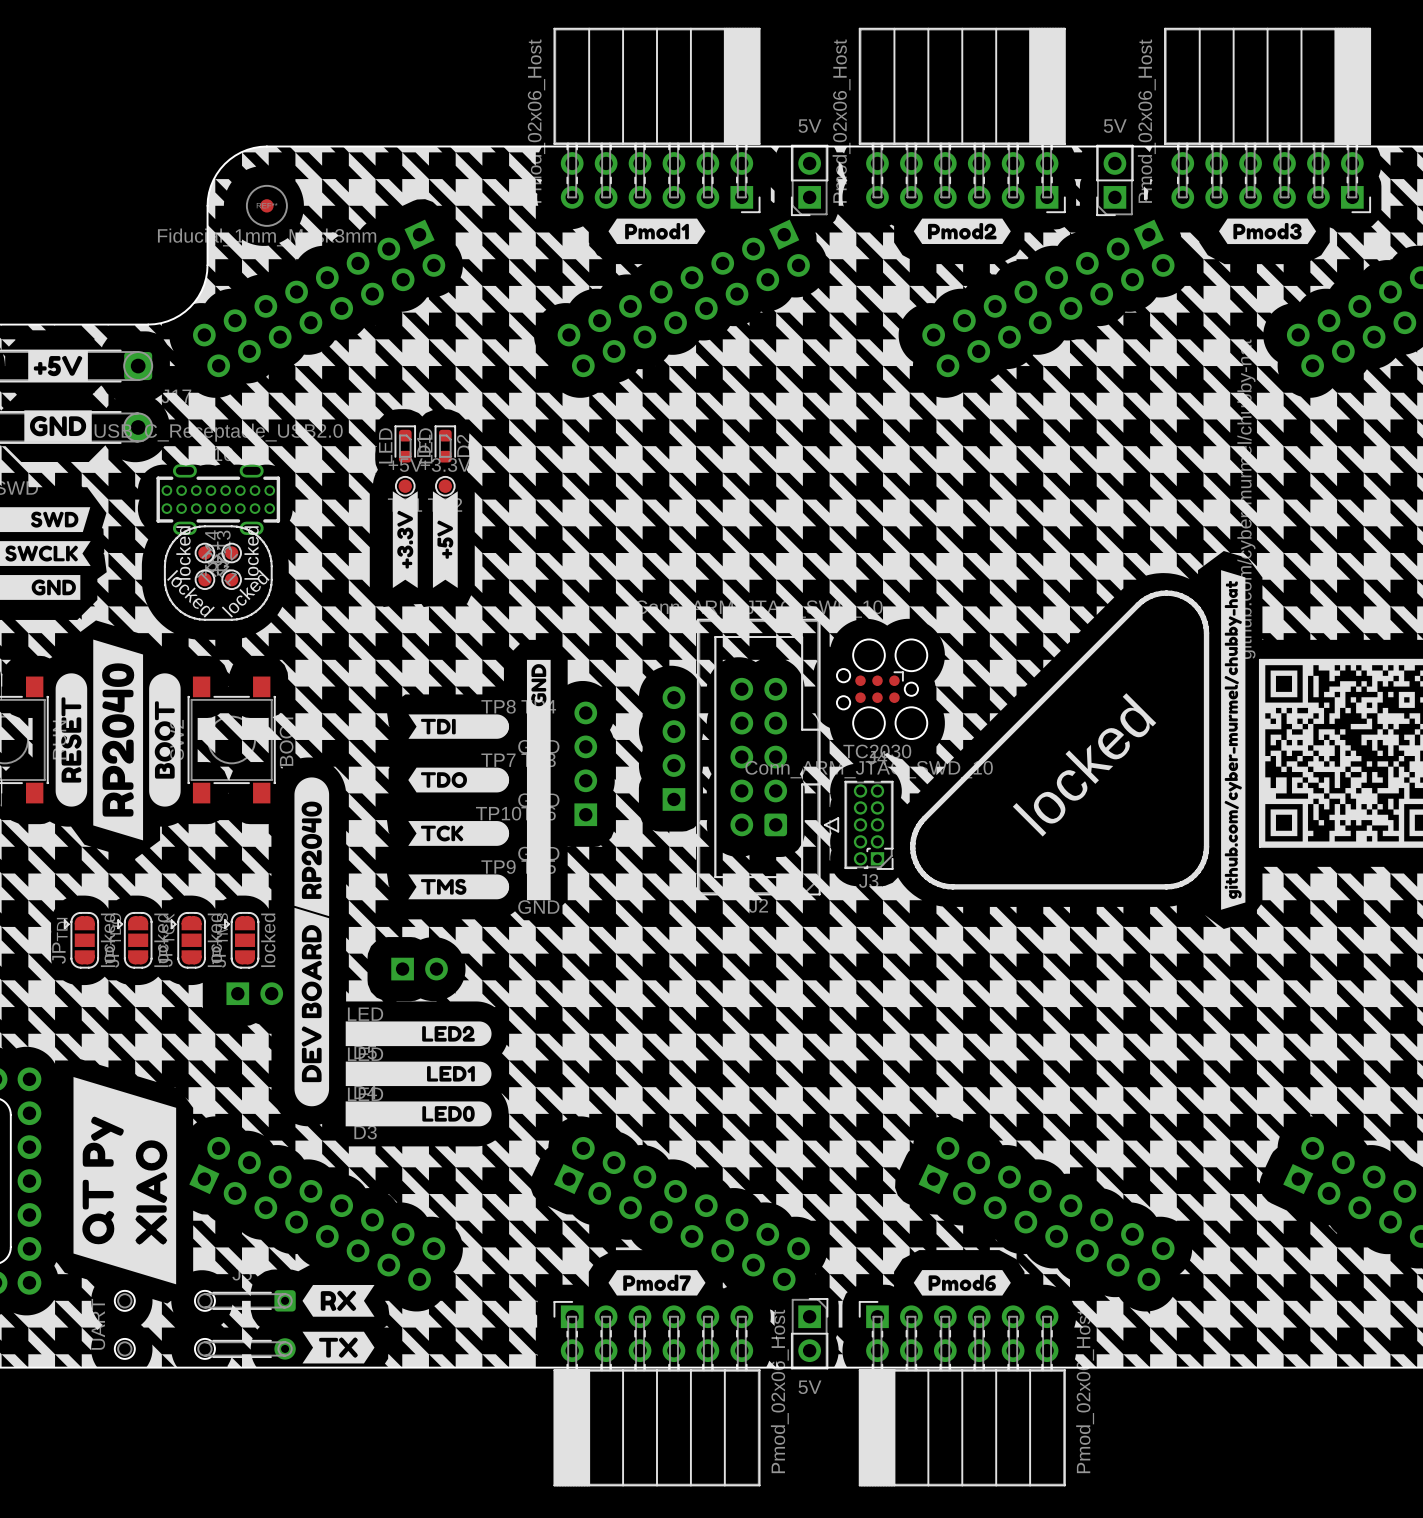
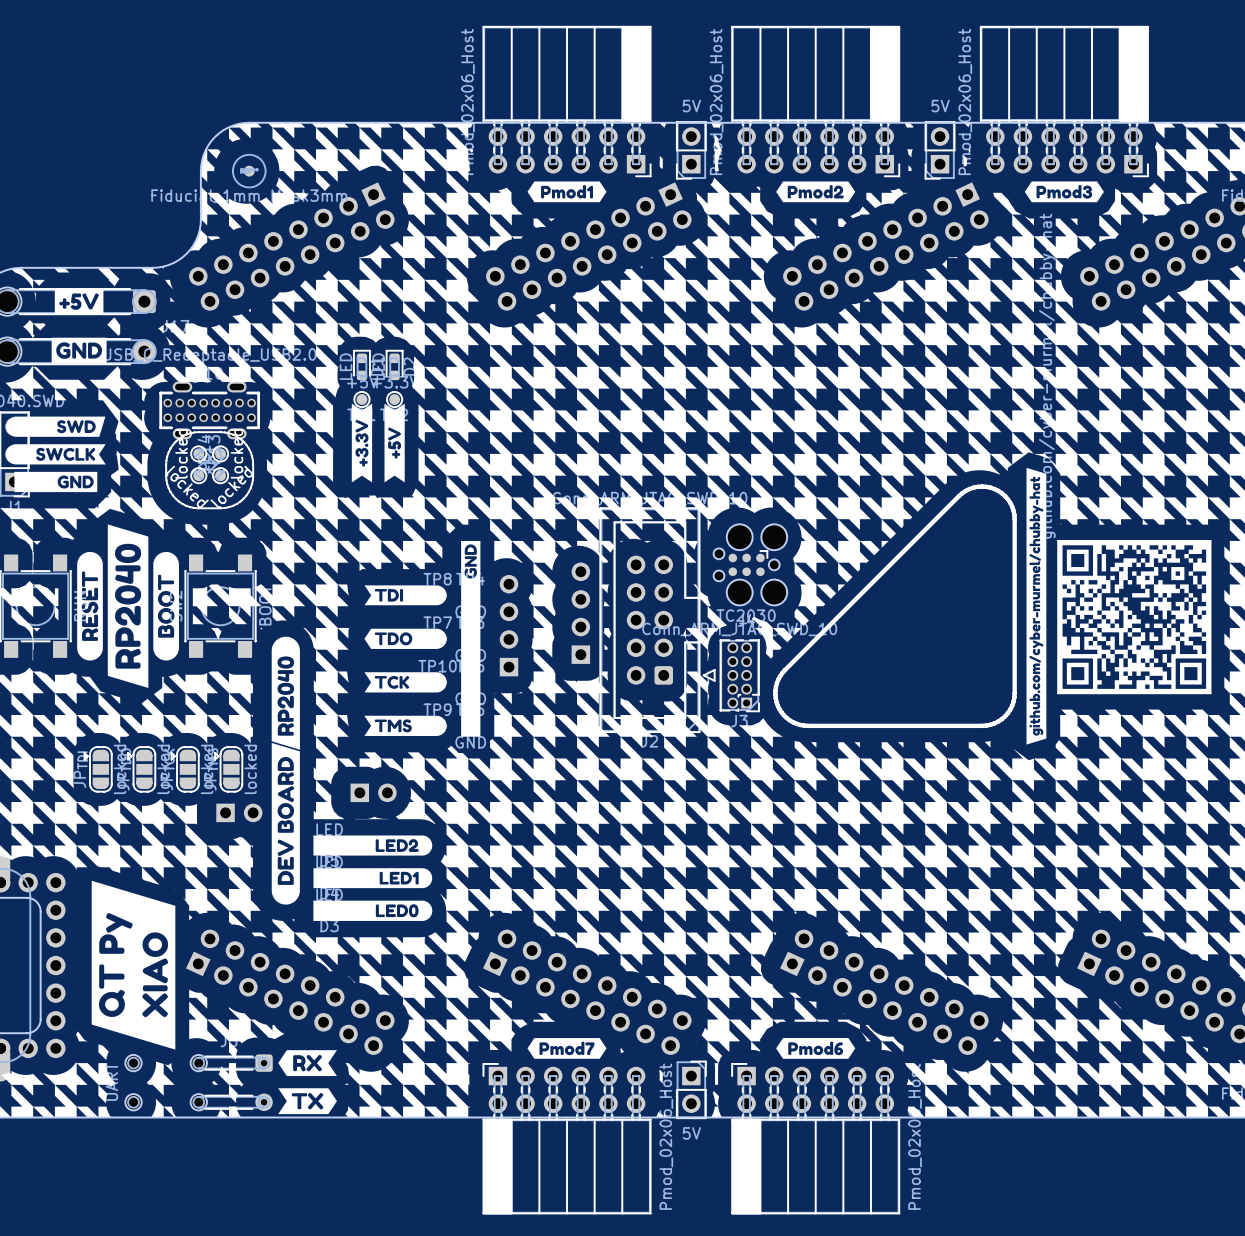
text: locked (1084, 764) -> none

